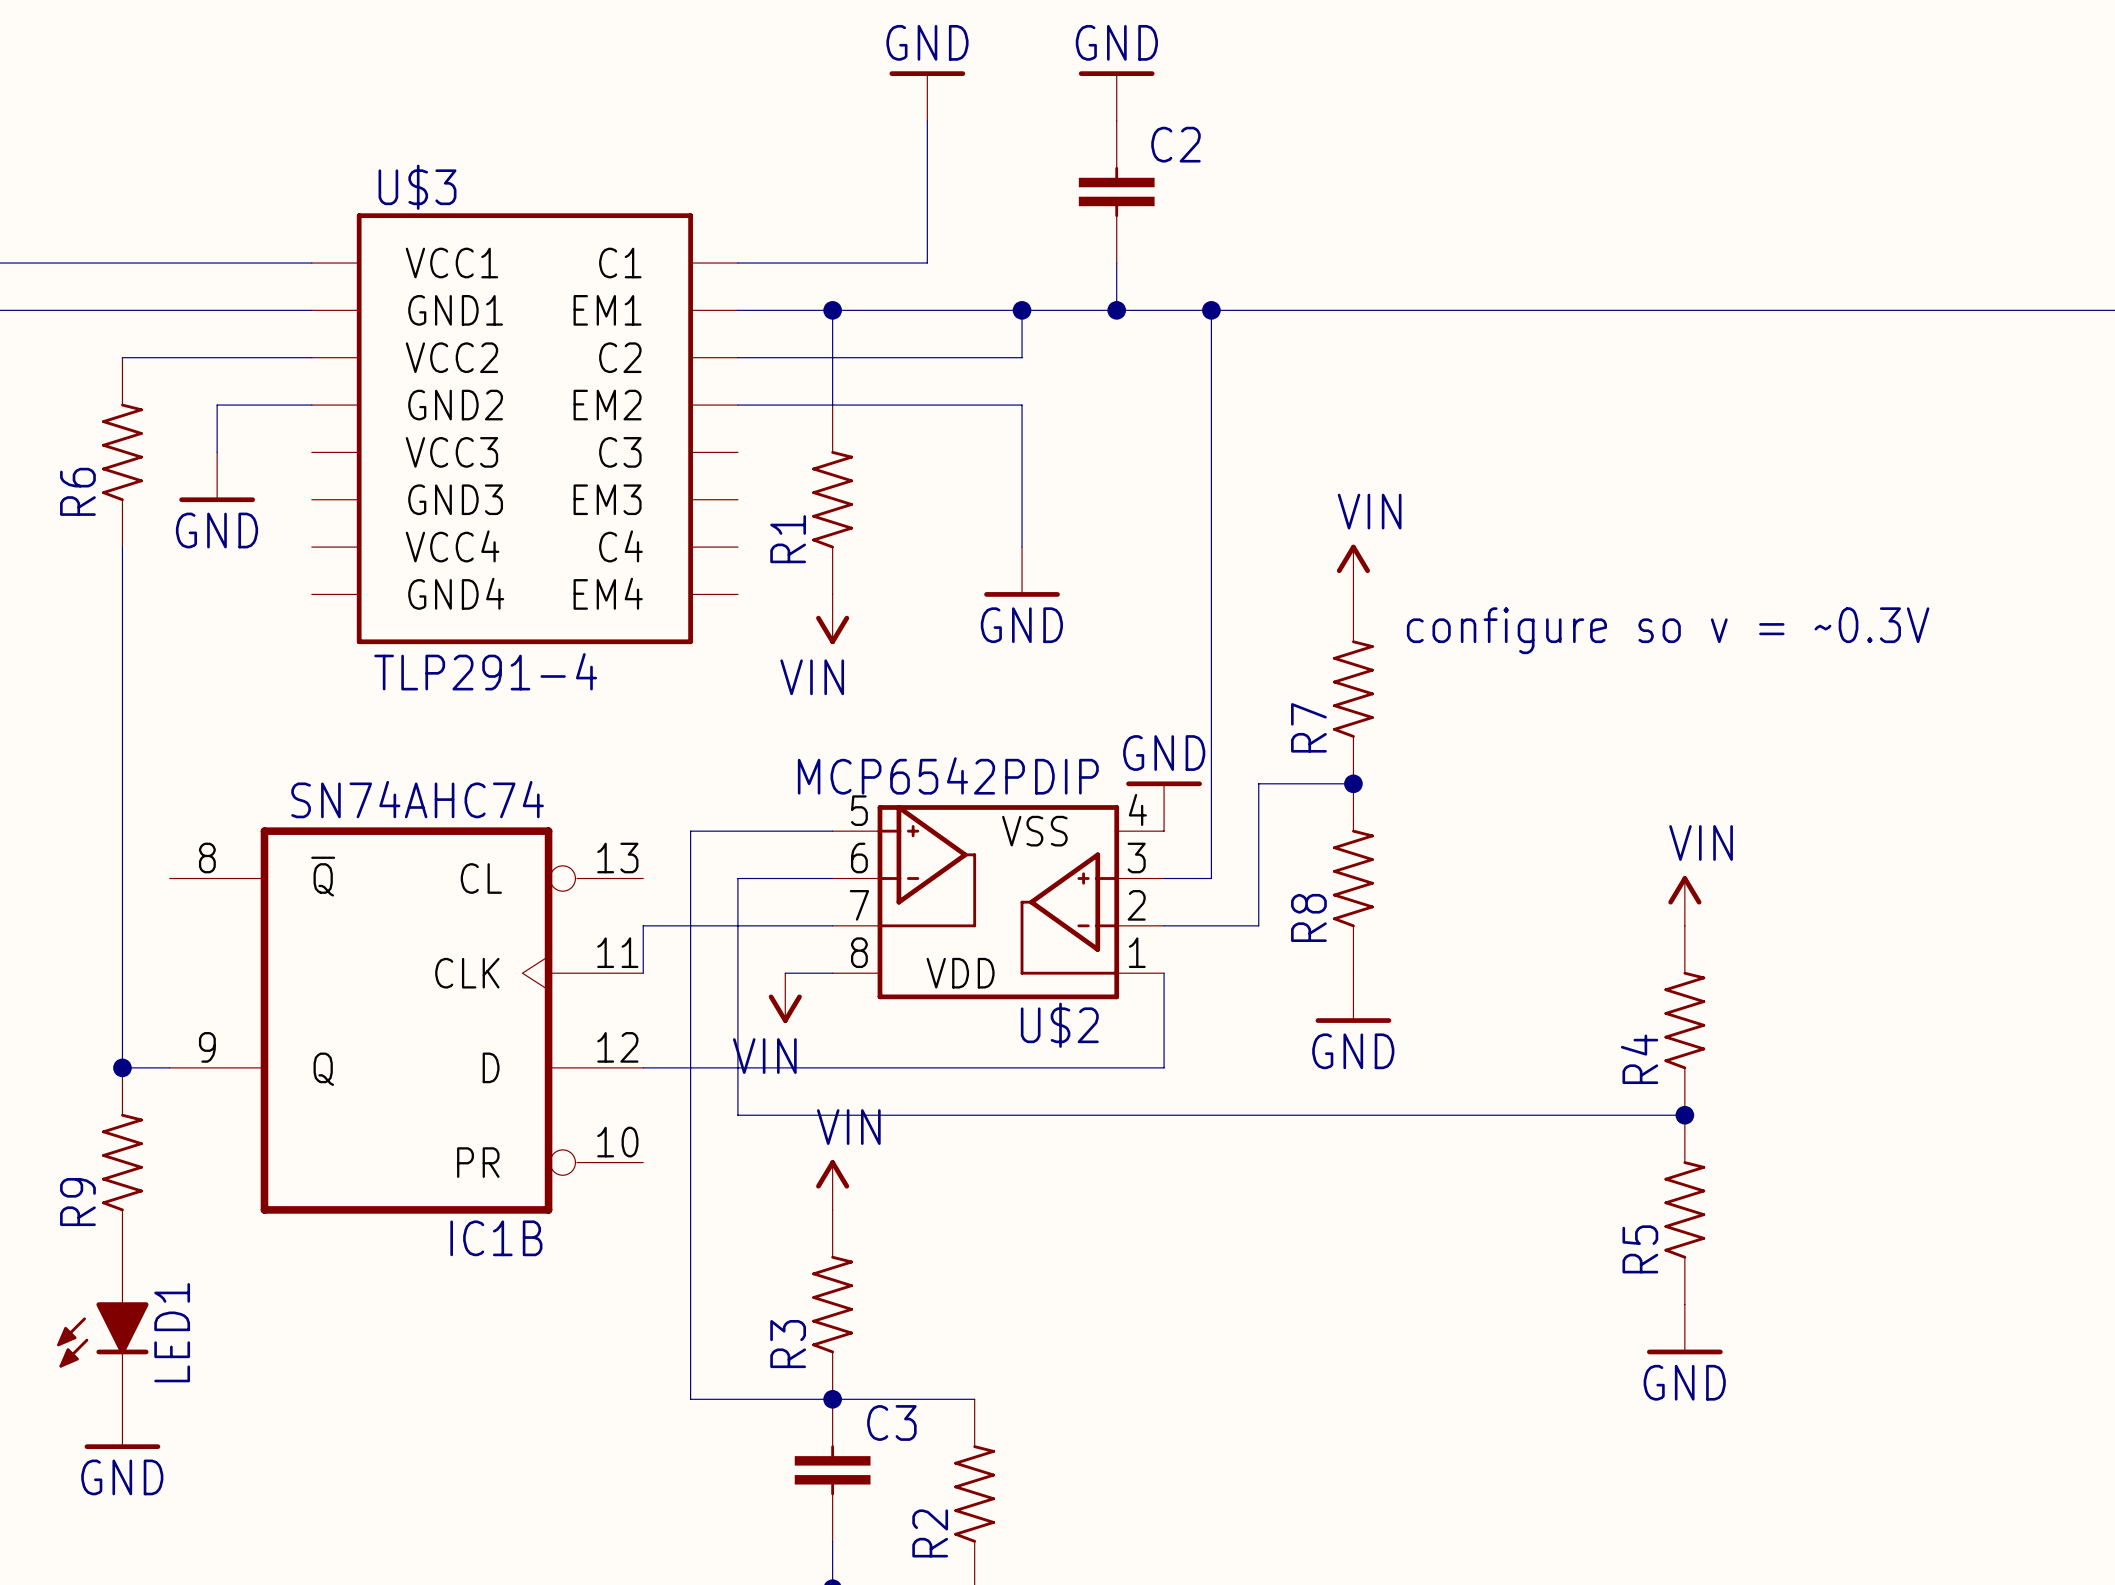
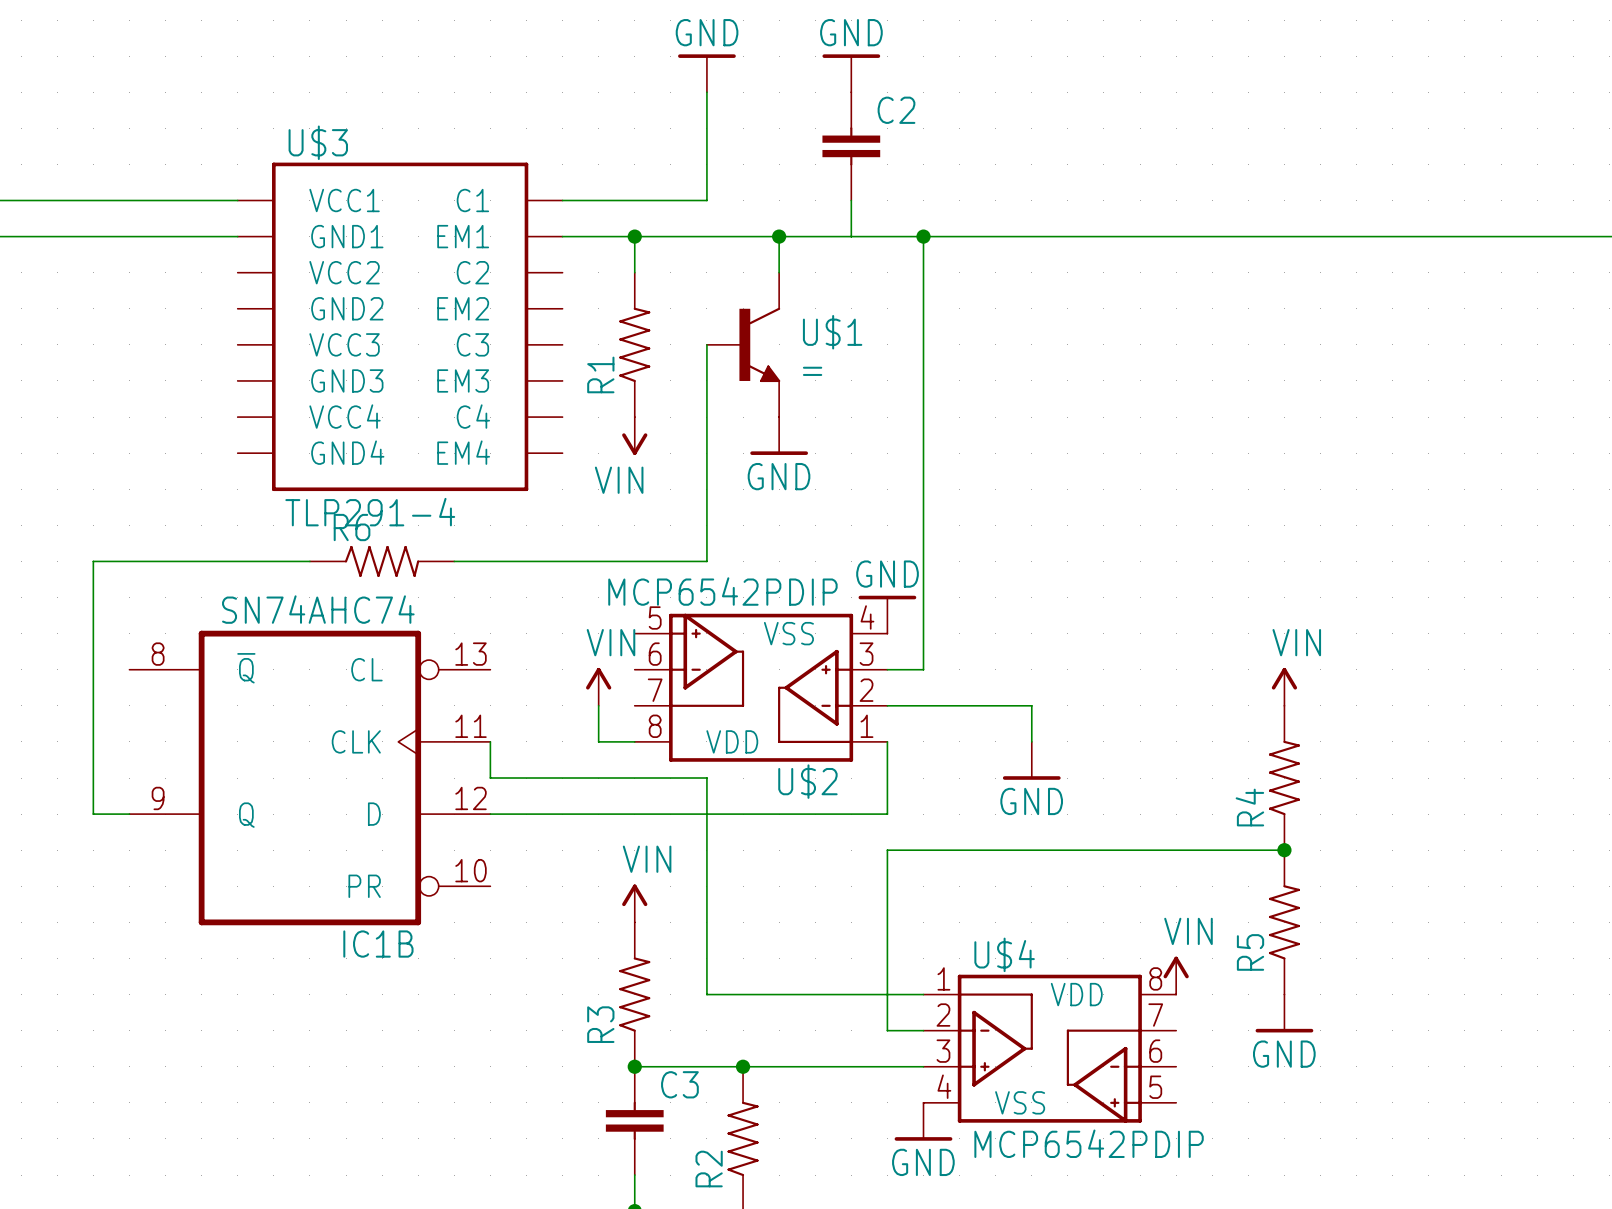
junction: (1116, 310) -> none
wire: (122, 357) (311, 357) -> none
wire: (737, 357) (1022, 357) -> none
wire: (311, 405) (217, 405) (217, 452) -> none
wire: (737, 405) (1022, 405) (1022, 547) -> none
R6 rotation: 0° (122, 452) -> 90° clockwise (382, 561)
R6 position: (122, 452) -> (382, 561)
wire: none -> (706, 344) (706, 561) (454, 561)
U$1: none -> = (743, 344)
power symbol: GND (217, 477) -> none
R1 position: (832, 499) -> (634, 344)
wire: (122, 547) (122, 736) -> (309, 561) (93, 561)
power symbol: VIN (1353, 569) -> none
power symbol position: VIN (832, 619) -> VIN (634, 436)
text: configure so v = ~0.3V (1668, 630) -> none
R7: (1353, 689) -> none
wire: (1353, 783) (1258, 783) (1258, 925) -> (1031, 741) (1031, 705) (959, 705)
junction: (1353, 783) -> none
wire: (832, 831) (690, 831) (690, 1399) (832, 1399) -> none
wire: (832, 878) (737, 878) (737, 1115) (1164, 1115) -> (923, 1030) (887, 1030) (887, 850)
R8: (1353, 878) -> none
wire: none -> (598, 705) (598, 741)
wire: (832, 925) (643, 925) (643, 973) -> (923, 994) (706, 994) (706, 778) (490, 778) (490, 741)
power symbol position: VIN (785, 998) -> VIN (598, 686)
power symbol rotation: 0° (785, 1008) -> 180° (598, 678)
junction: (122, 1067) -> none
R9: (122, 1162) -> none
power symbol: none -> VIN (1176, 975)
LED1: (102, 1328) -> none
U$4: none -> MCP6542PDIP (1049, 1048)
wire: none -> (743, 1066) (923, 1066)
junction: none -> (743, 1066)
power symbol: GND (122, 1424) -> none
power symbol: none -> GND (923, 1121)

